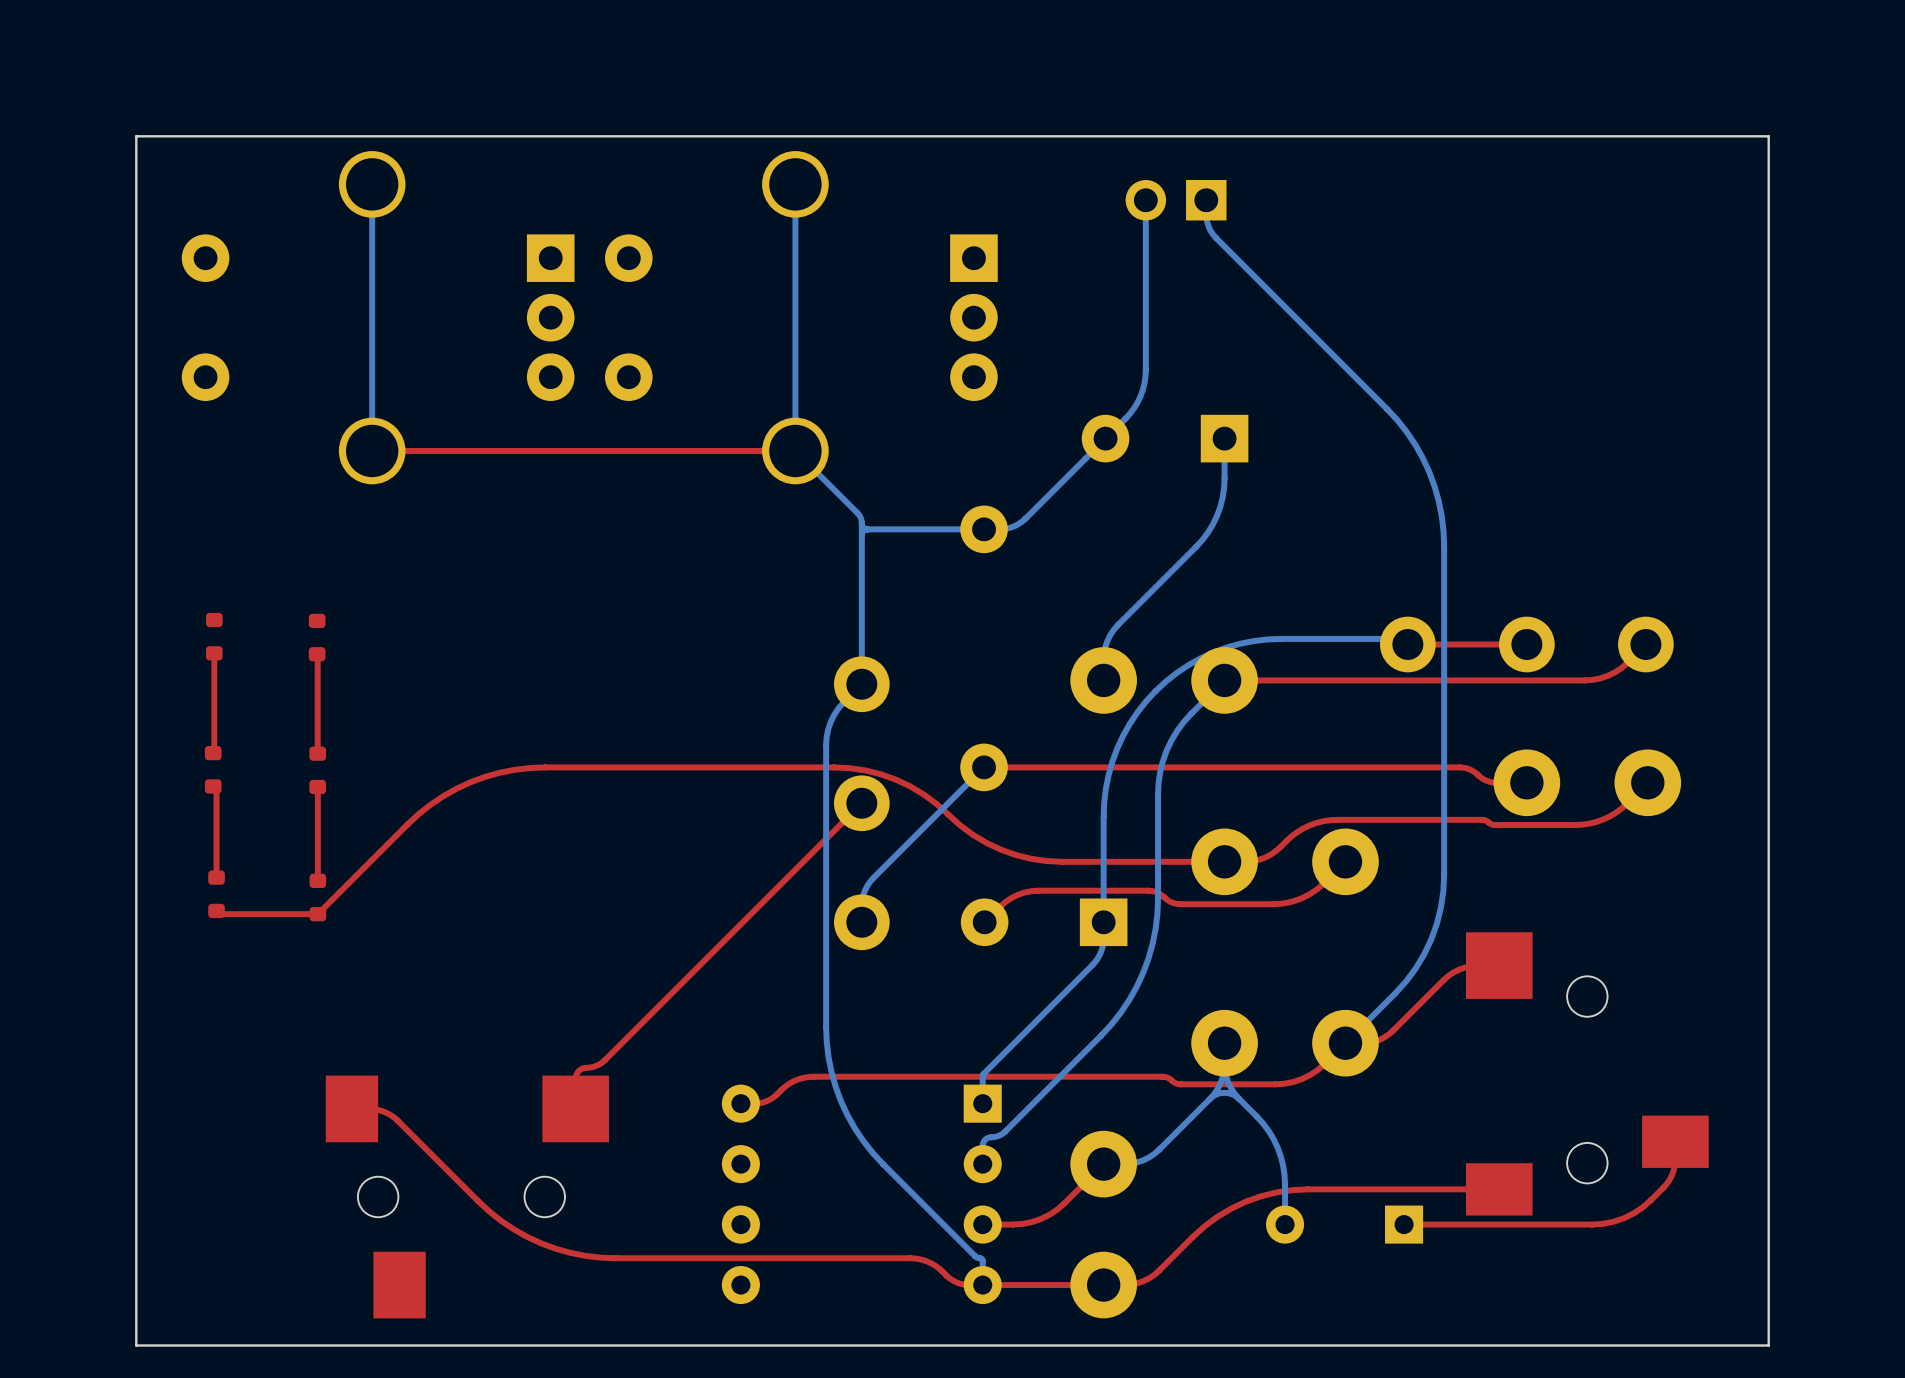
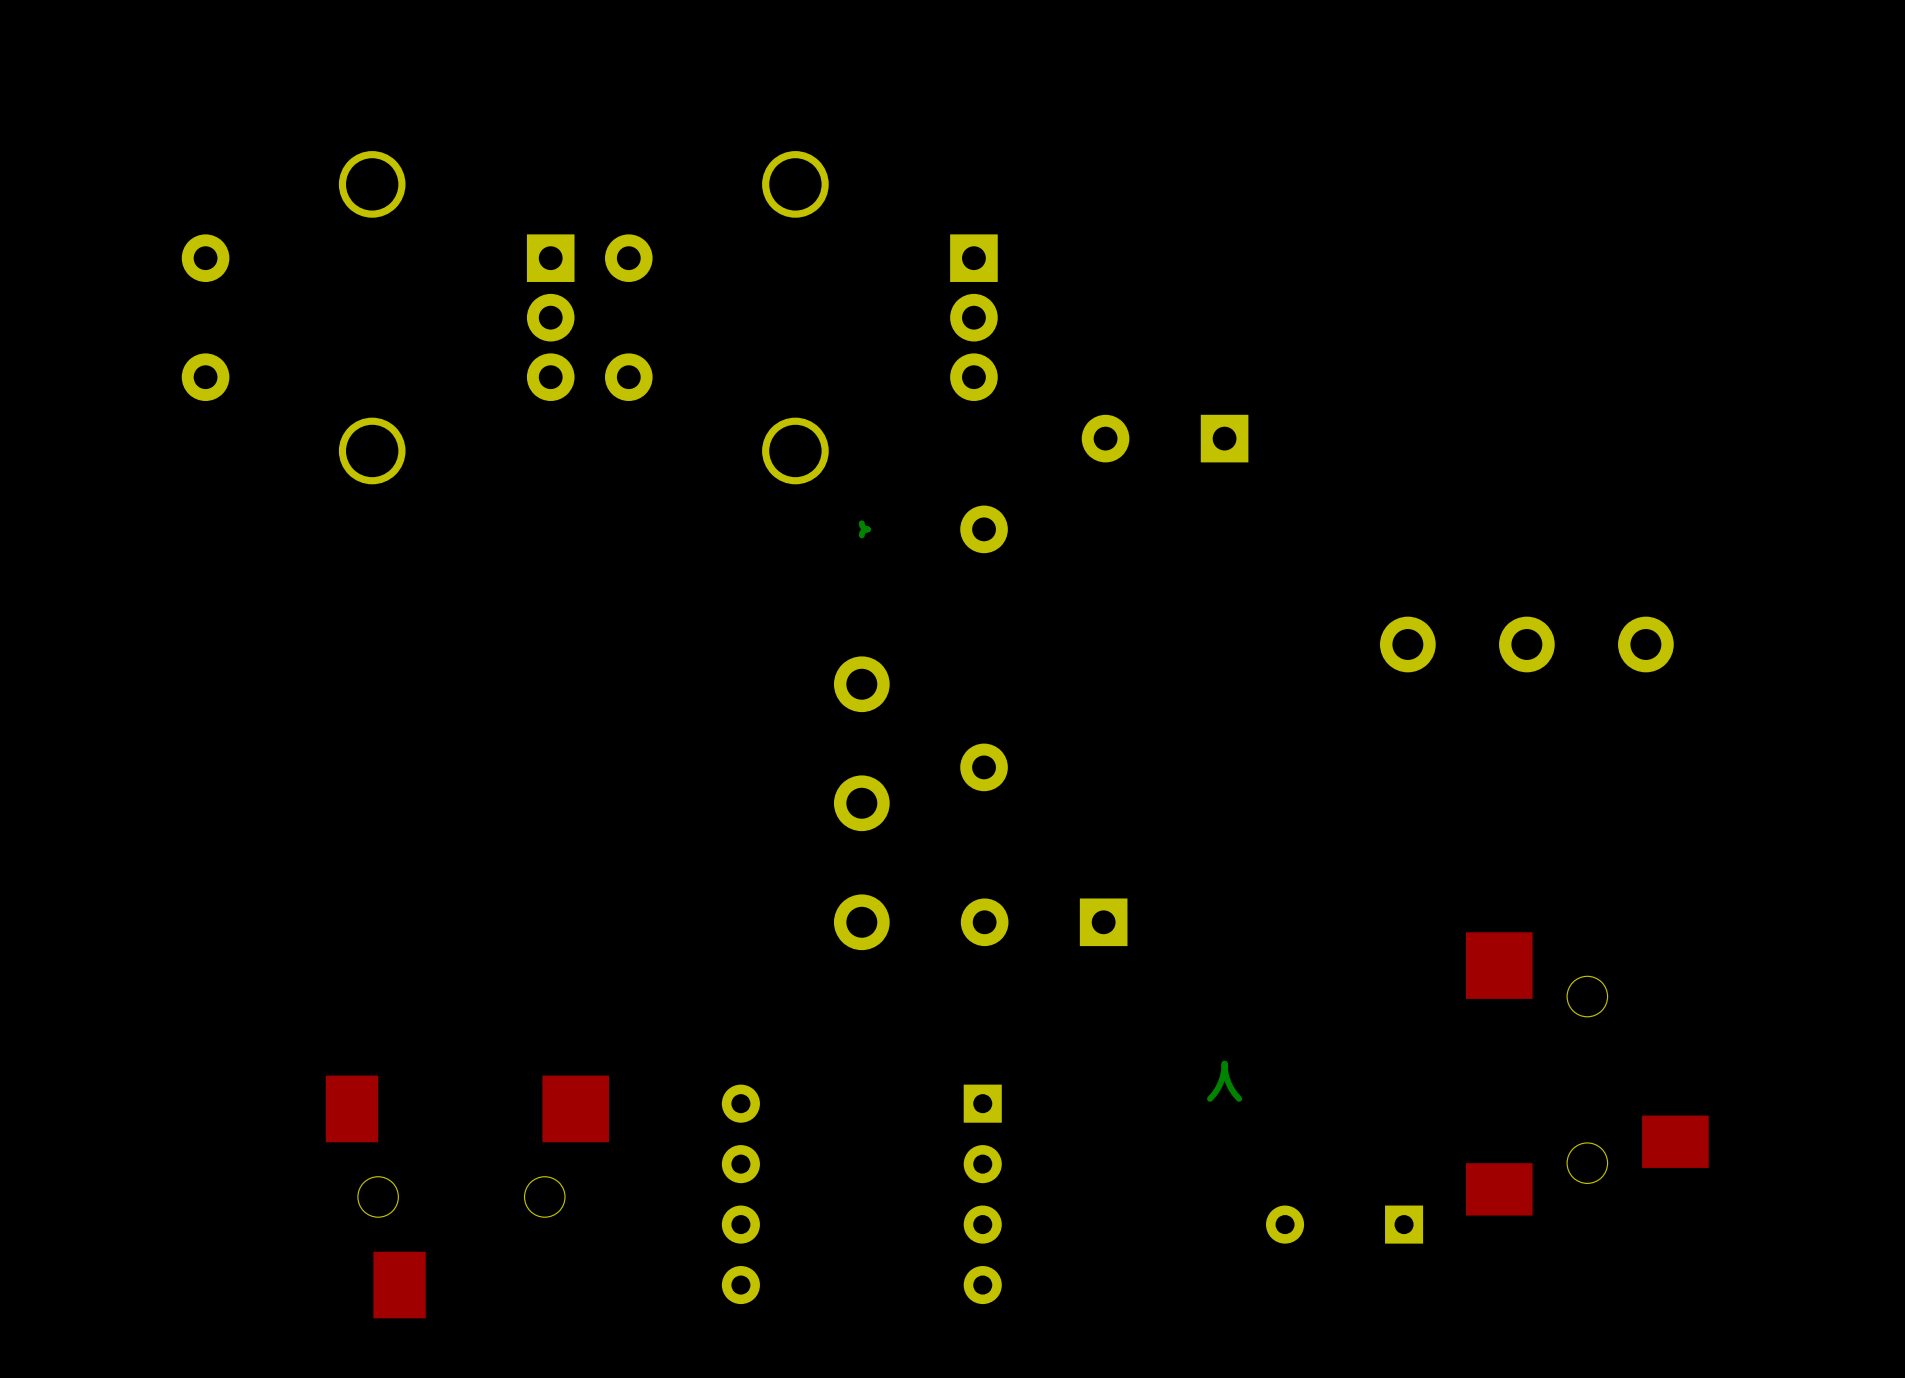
board edge: (1768, 136) (136, 136) (136, 1345) (1768, 1345) (1768, 136) -> none
bottom track: (372, 184) (372, 450) -> none
bottom track: (795, 184) (795, 450) (857, 513) (861, 523) (861, 684) (834, 714) (828, 729) (826, 745) (826, 1026) (828, 1057) (840, 1101) (863, 1140) (883, 1164) (975, 1256) (982, 1259) (982, 1285) -> none
bottom track: (1145, 200) (1145, 376) (1140, 396) (1130, 413) (1025, 518) (1013, 526) (999, 529) (867, 529) -> none
part: (1176, 200) -> none
bottom track: (1206, 200) (1207, 223) (1213, 234) (1387, 409) (1407, 432) (1429, 472) (1441, 516) (1444, 546) (1444, 874) (1440, 907) (1431, 939) (1415, 968) (1394, 993) (1345, 1043) -> none
bottom track: (1224, 438) (1224, 487) (1220, 506) (1213, 523) (1196, 546) (1113, 629) (1105, 647) (1103, 680) -> none
top track: (795, 450) (372, 450) -> none
part: (214, 636) -> none
part: (317, 637) -> none
bottom track: (1407, 644) (1398, 638) (1281, 638) (1253, 641) (1226, 647) (1200, 658) (1176, 672) (1155, 690) (1137, 712) (1123, 735) (1108, 775) (1104, 802) (1103, 938) (1100, 952) (1092, 965) (983, 1074) (982, 1103) -> none
top track: (1526, 644) (1407, 644) -> none
top track: (1645, 644) (1615, 672) (1592, 679) (1224, 680) -> none
top track: (214, 653) (213, 753) -> none
top track: (317, 654) (317, 753) -> none
part: (1164, 680) -> none
bottom track: (1224, 680) (1183, 721) (1171, 740) (1162, 761) (1158, 794) (1157, 913) (1152, 943) (1136, 986) (1120, 1012) (1101, 1035) (1005, 1131) (984, 1140) (982, 1164) -> none
top track: (984, 767) (1459, 767) (1471, 770) (1489, 781) (1526, 782) -> none
bottom track: (984, 767) (869, 881) (863, 895) (861, 922) -> none
part: (213, 769) -> none
part: (317, 770) -> none
part: (1587, 782) -> none
top track: (1647, 782) (1615, 812) (1603, 819) (1582, 824) (1494, 824) (1482, 819) (1330, 820) (1303, 828) (1269, 855) (1251, 861) (1062, 861) (1030, 858) (1000, 849) (972, 834) (936, 803) (910, 786) (896, 779) (865, 770) (834, 767) (529, 768) (499, 772) (470, 782) (430, 804) (407, 824) (317, 914) (222, 914) (216, 910) -> none
top track: (213, 786) (216, 792) (216, 877) -> none
top track: (317, 787) (317, 880) -> none
top track: (861, 803) (604, 1060) (596, 1065) (578, 1070) (575, 1077) (575, 1108) -> none
part: (1285, 861) -> none
top track: (1345, 861) (1324, 883) (1309, 894) (1282, 903) (1180, 904) (1171, 902) (1158, 893) (1150, 890) (1038, 890) (1024, 892) (1011, 897) (984, 922) -> none
part: (216, 894) -> none
part: (317, 897) -> none
top track: (1499, 965) (1472, 966) (1453, 972) (1384, 1037) (1368, 1042) (1345, 1043) (1310, 1074) (1284, 1083) (1180, 1084) (1162, 1076) (813, 1076) (792, 1082) (766, 1101) (740, 1103) -> none
part: (1285, 1043) -> none
top track: (351, 1108) (376, 1109) (391, 1115) (489, 1211) (527, 1237) (555, 1248) (585, 1255) (615, 1258) (914, 1258) (931, 1263) (953, 1280) (965, 1284) (1124, 1285) (1137, 1283) (1154, 1274) (1192, 1237) (1217, 1216) (1245, 1201) (1276, 1192) (1308, 1189) (1499, 1189) -> none
top track: (1675, 1141) (1674, 1166) (1666, 1184) (1642, 1207) (1613, 1221) (1591, 1224) (1404, 1224) -> none
top track: (1103, 1164) (1064, 1203) (1049, 1214) (1022, 1223) (982, 1224) -> none
bottom track: (1103, 1164) (1130, 1163) (1149, 1157) (1211, 1097) (1222, 1092) (1231, 1093) (1239, 1098) (1263, 1123) (1277, 1147) (1284, 1175) (1285, 1224) -> none
part: (1103, 1224) -> none

